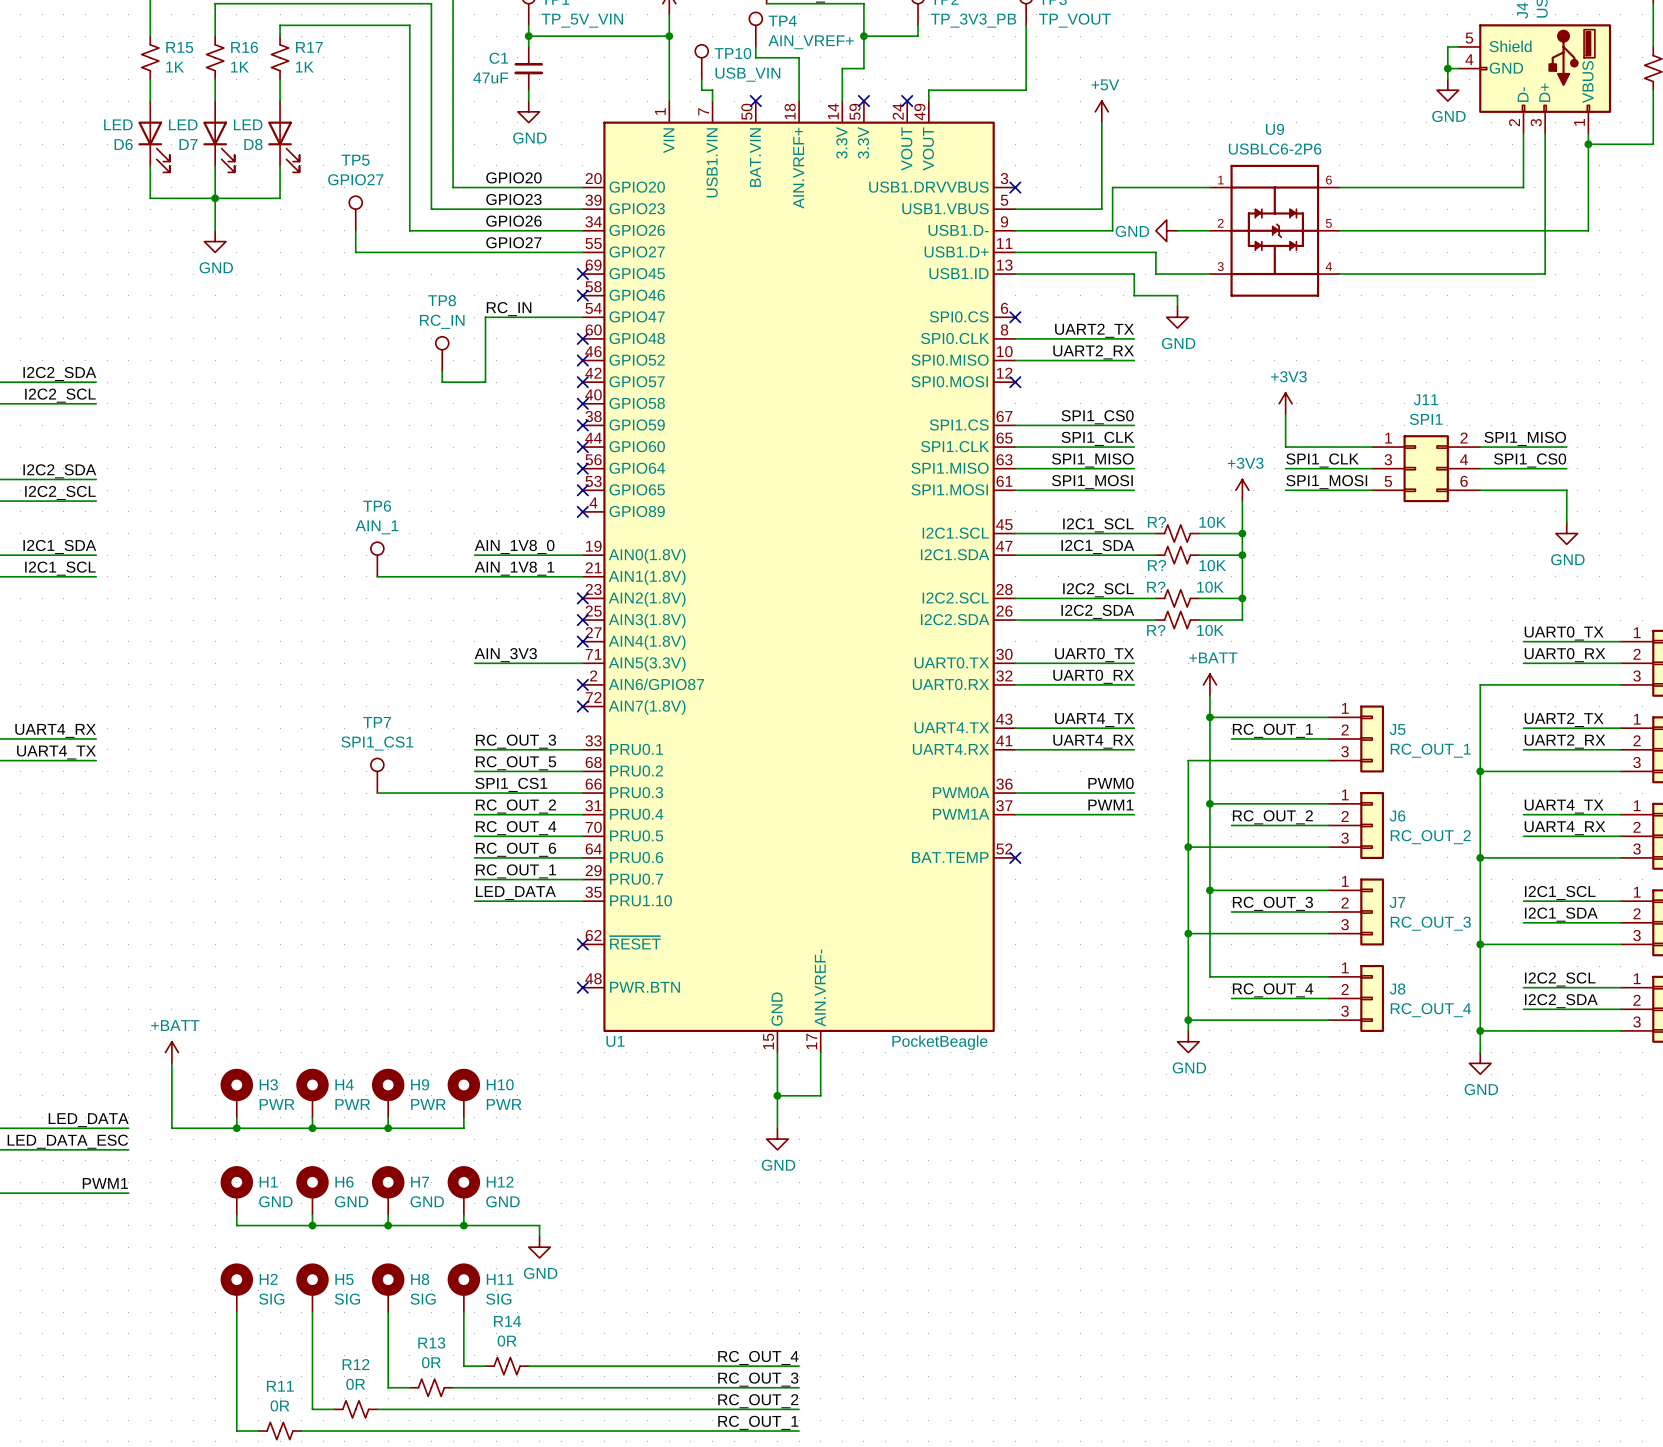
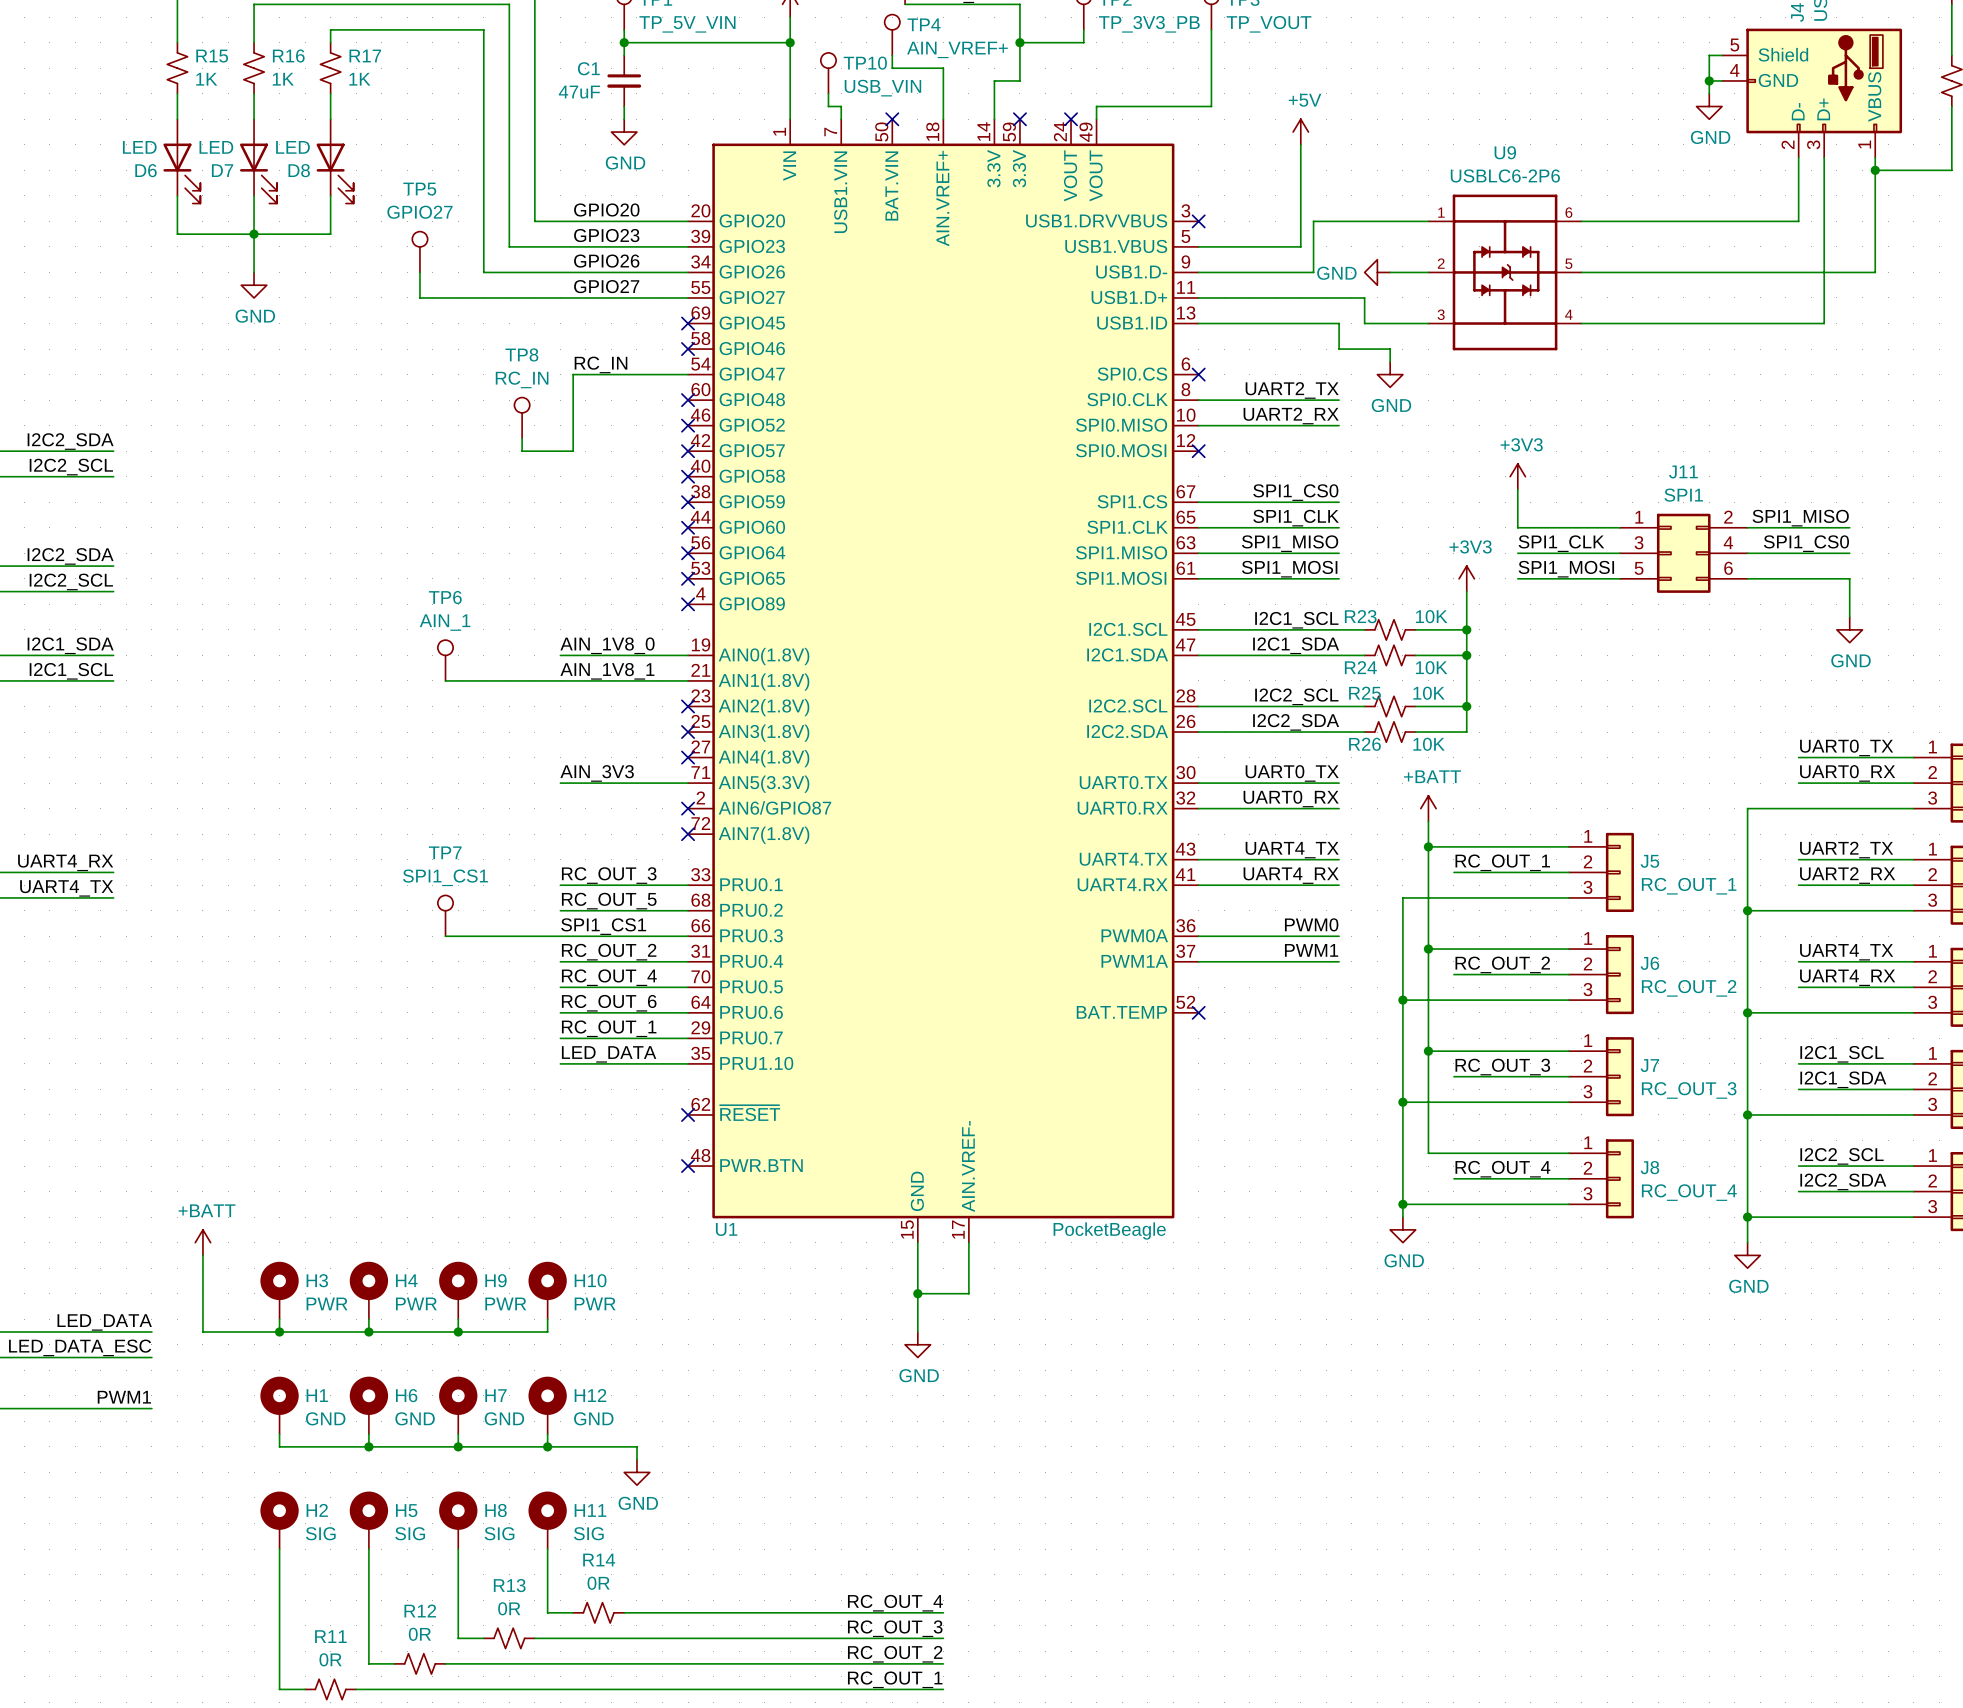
R? name: R? (1157, 522) -> R23 (1360, 616)
R? name: R? (1157, 565) -> R24 (1360, 667)
R? name: R? (1156, 587) -> R25 (1364, 693)
R? name: R? (1156, 630) -> R26 (1364, 744)

